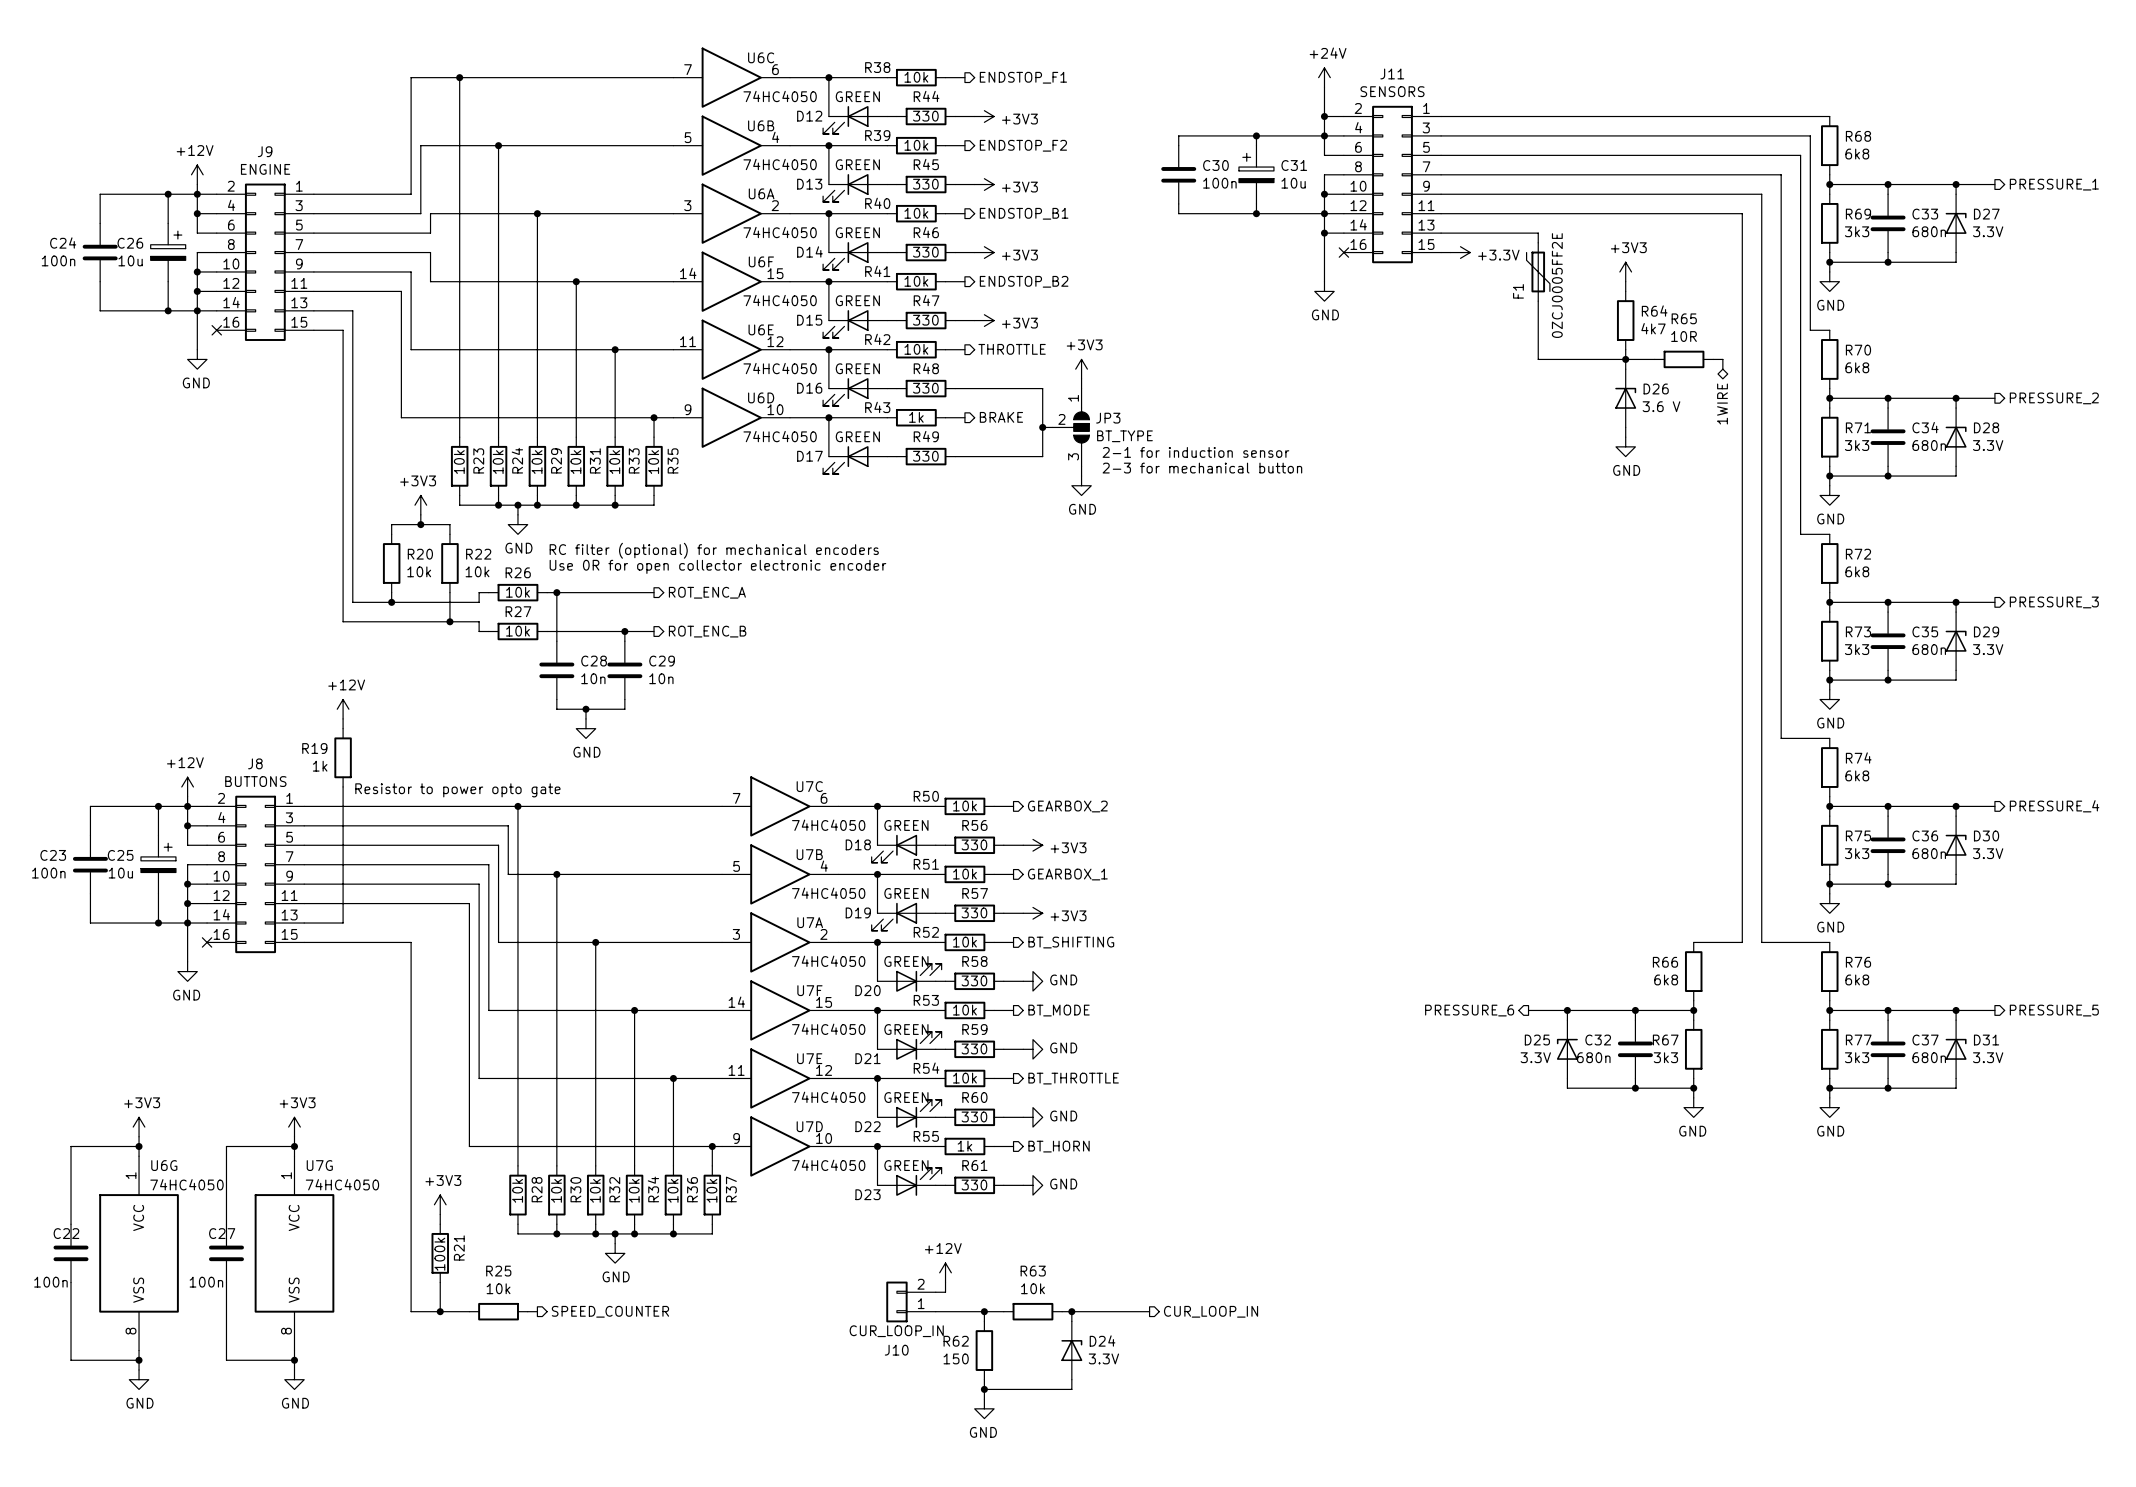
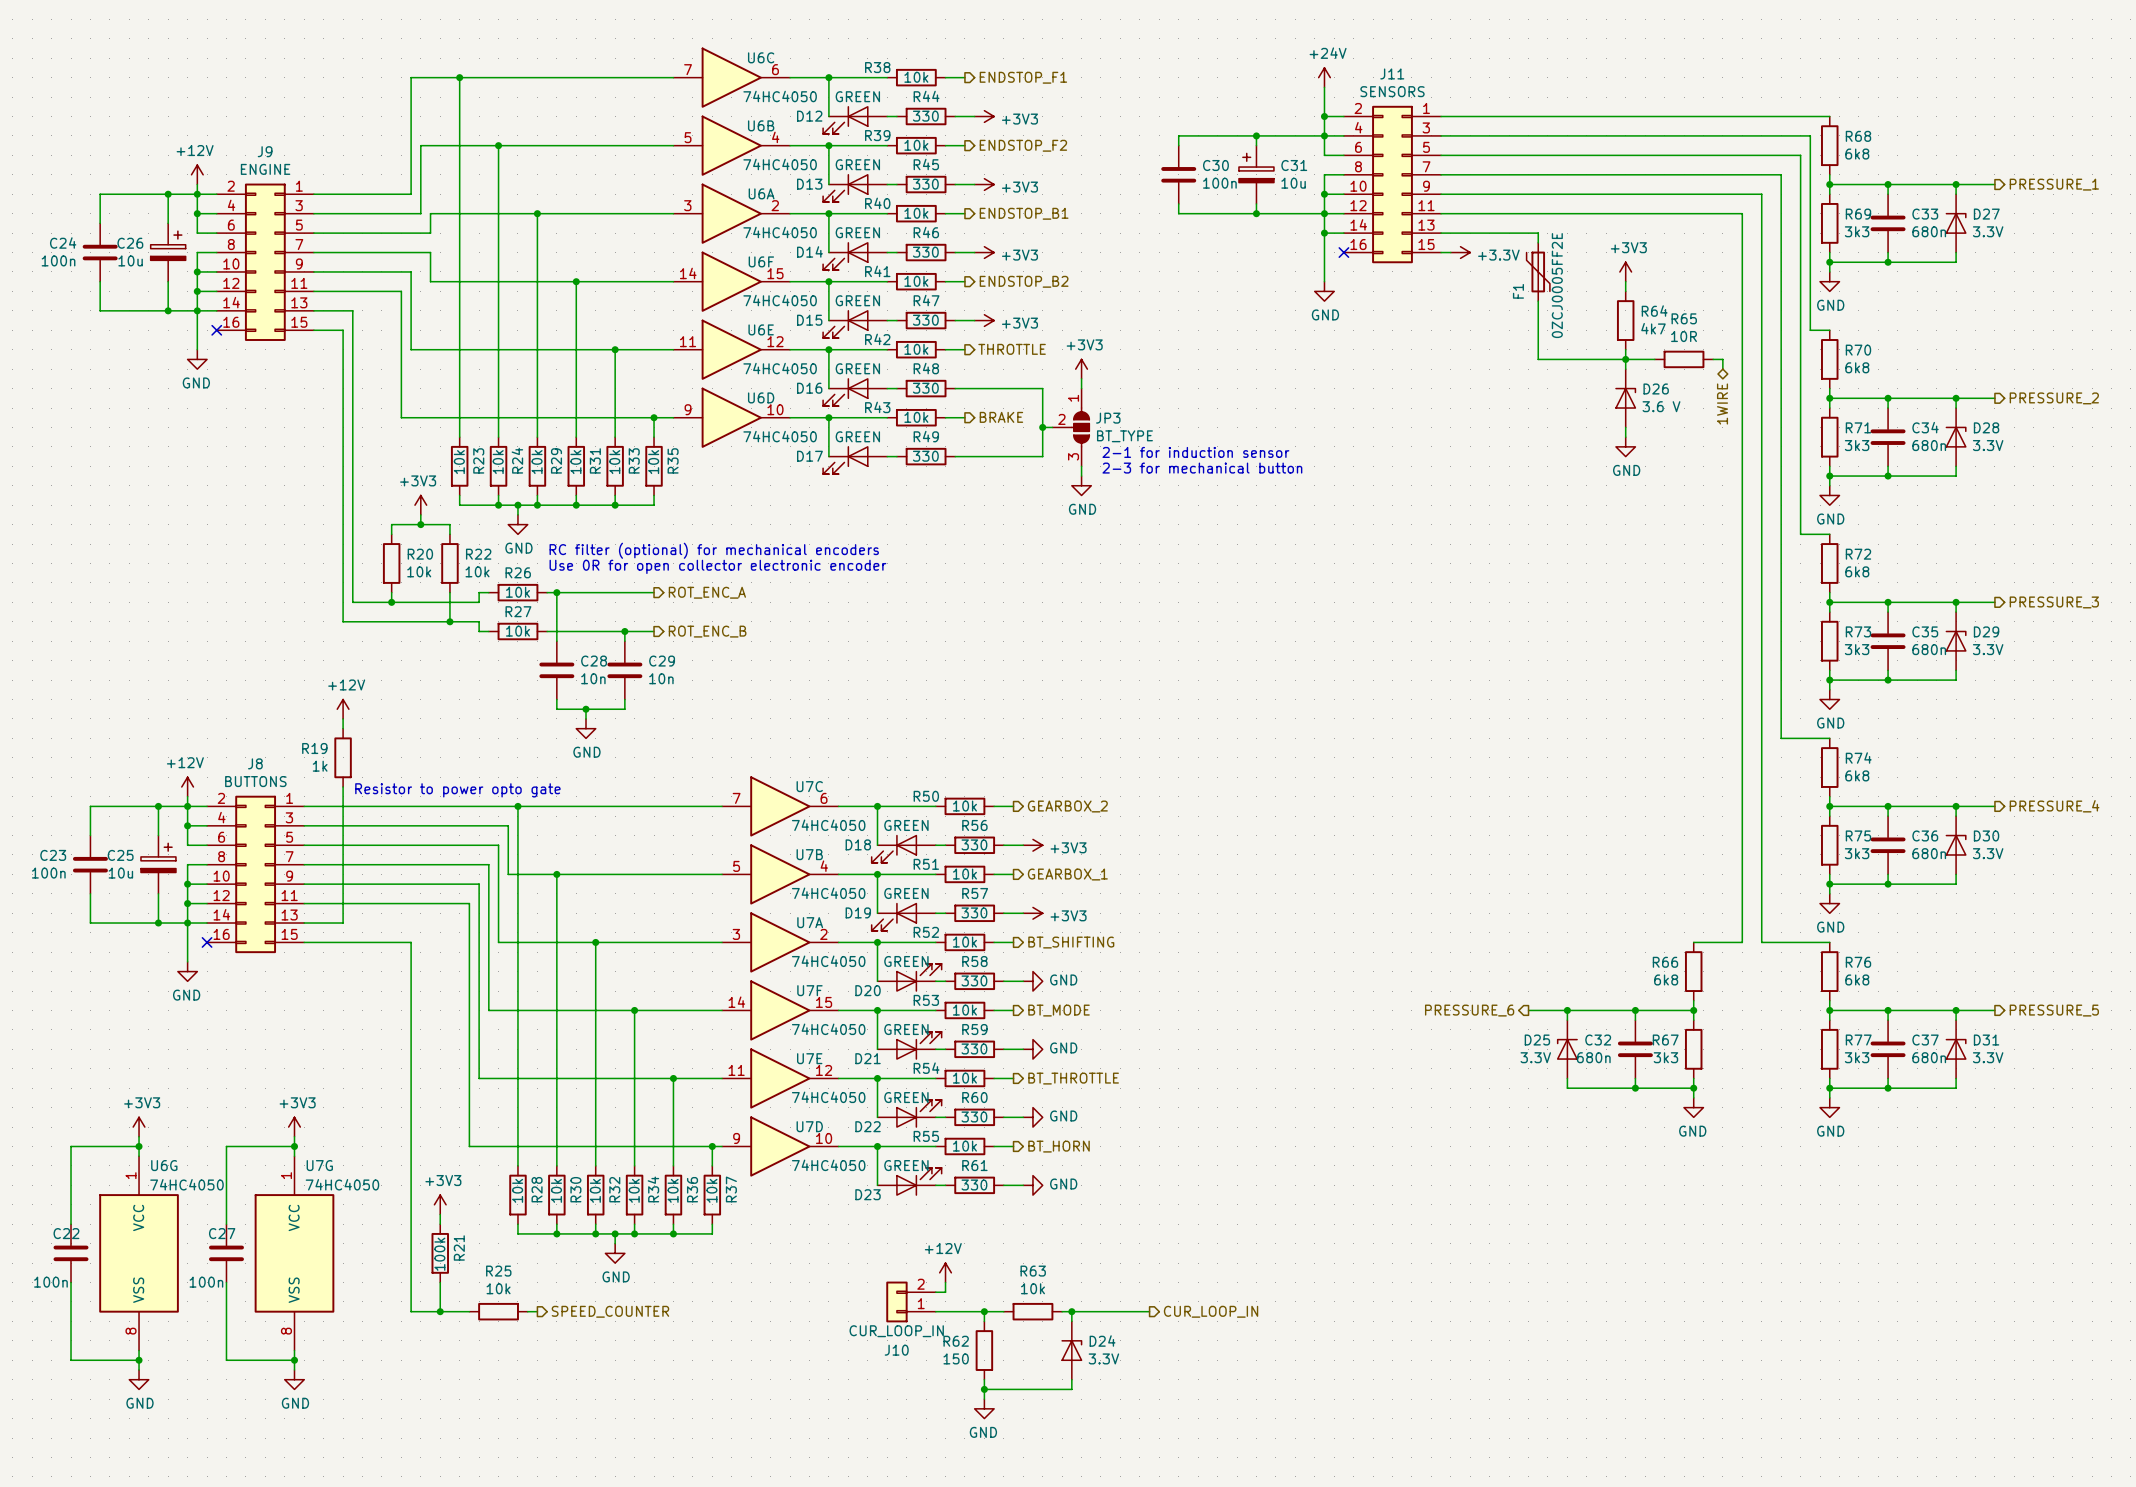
R43 value: 1k (916, 417) -> 10k (916, 417)
R55 value: 1k (964, 1146) -> 10k (964, 1146)

